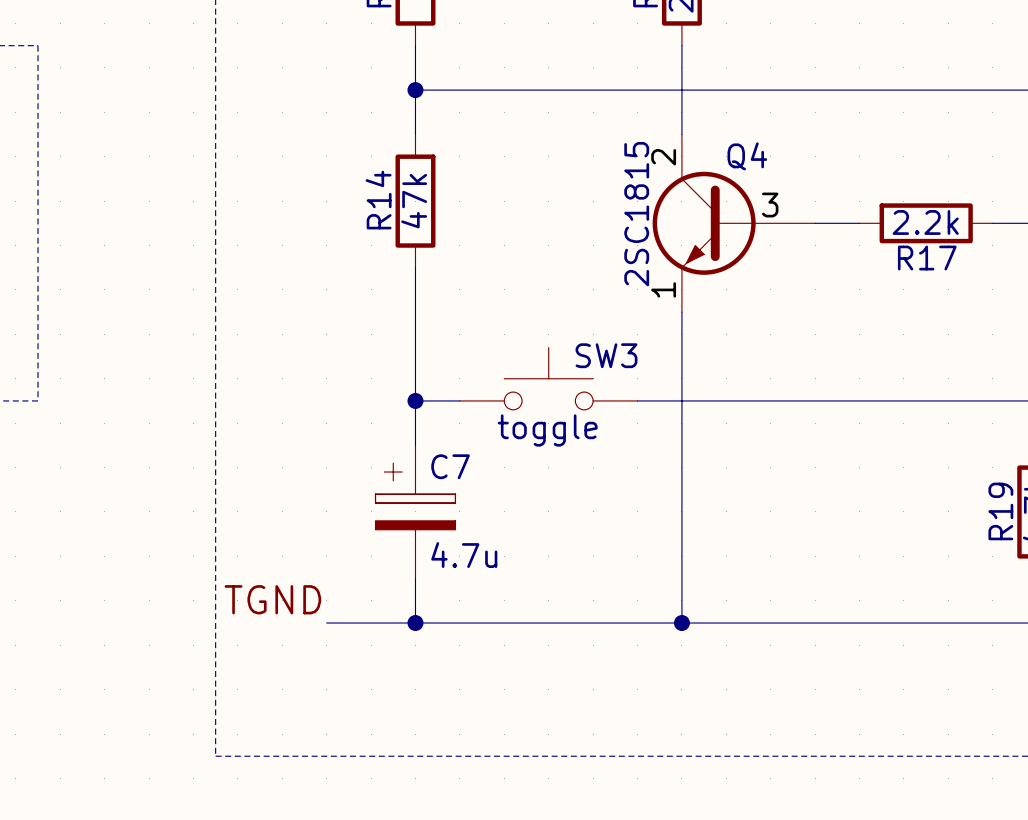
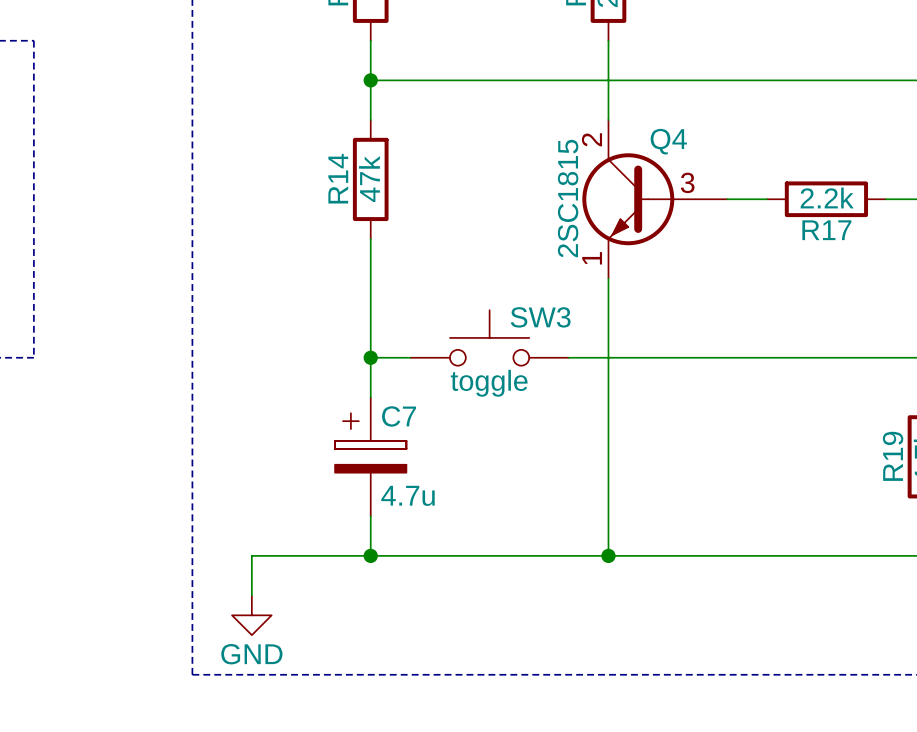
label: TGND (272, 599) -> none
wire: none -> (291, 555) (251, 555) (251, 595)
power symbol: none -> GND (251, 615)

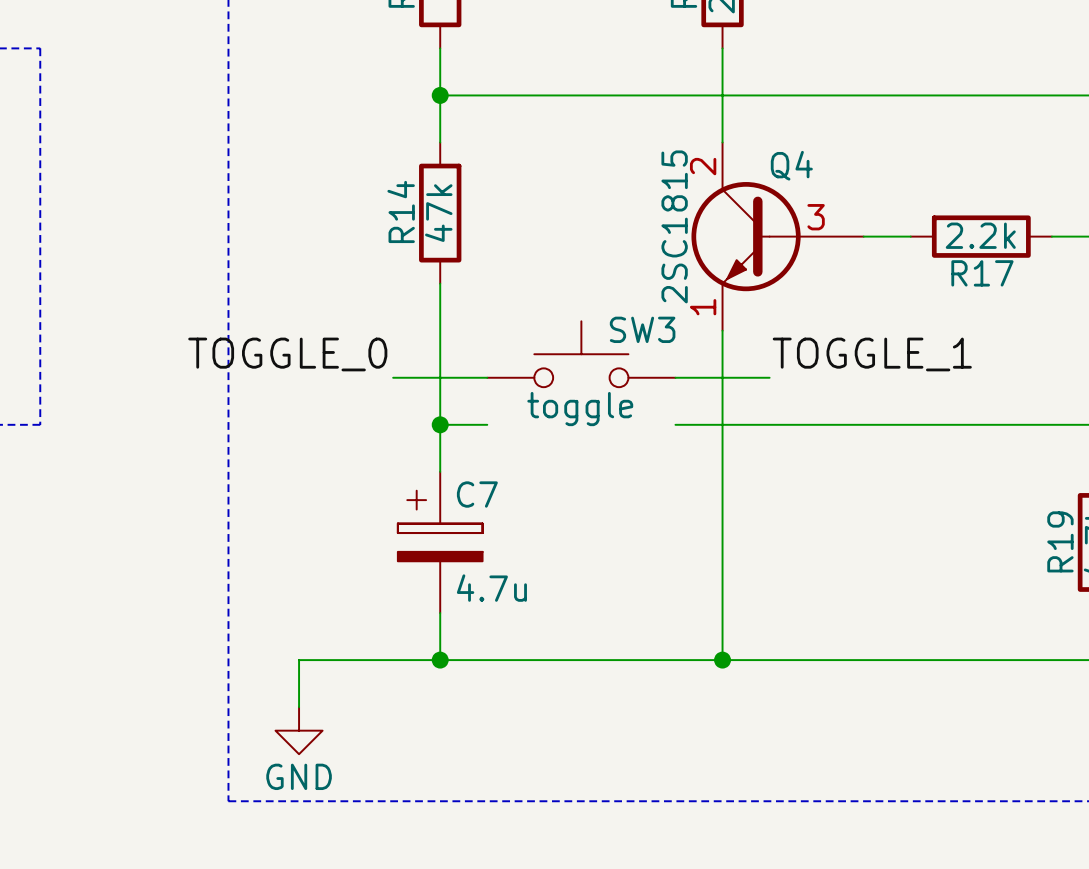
label: none -> TOGGLE_0 (287, 354)
label: none -> TOGGLE_1 (872, 354)
wire: none -> (393, 377) (487, 377)
wire: none -> (675, 377) (769, 377)
SW3 position: (489, 337) -> (581, 354)

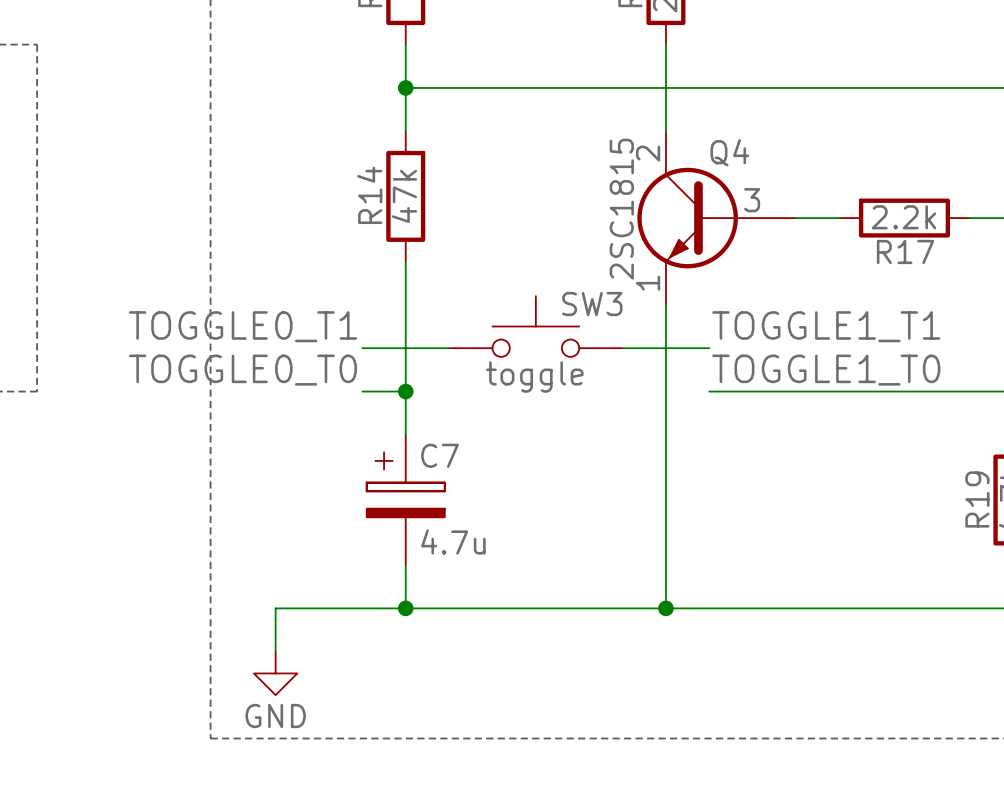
label: TOGGLE_0 (287, 354) -> TOGGLE0_T1 (242, 326)
label: TOGGLE_1 (872, 354) -> TOGGLE1_T1 (826, 326)
label: none -> TOGGLE0_T0 (242, 370)
label: none -> TOGGLE1_T0 (826, 370)
wire: (440, 424) (487, 424) -> (405, 391) (362, 391)
wire: (675, 424) (769, 424) -> none

